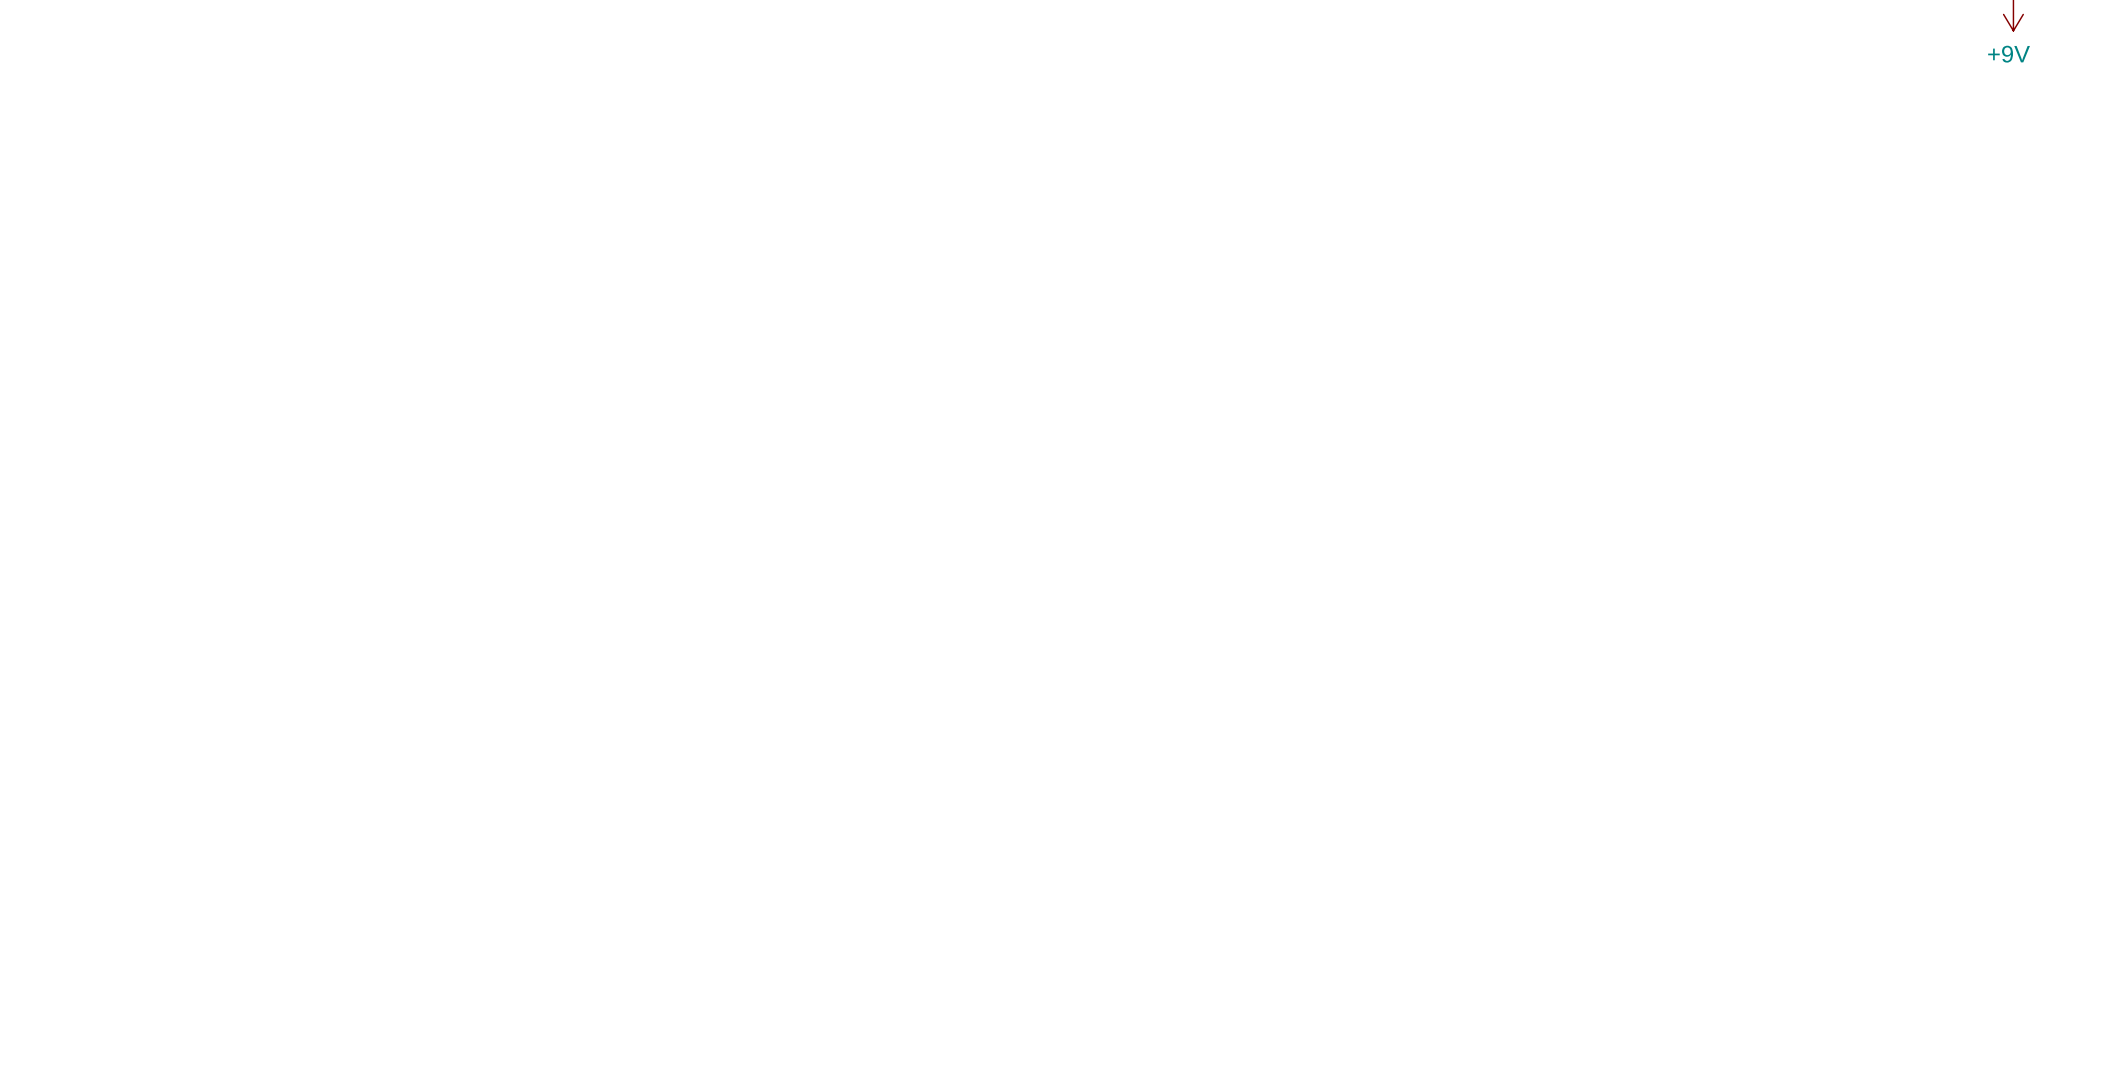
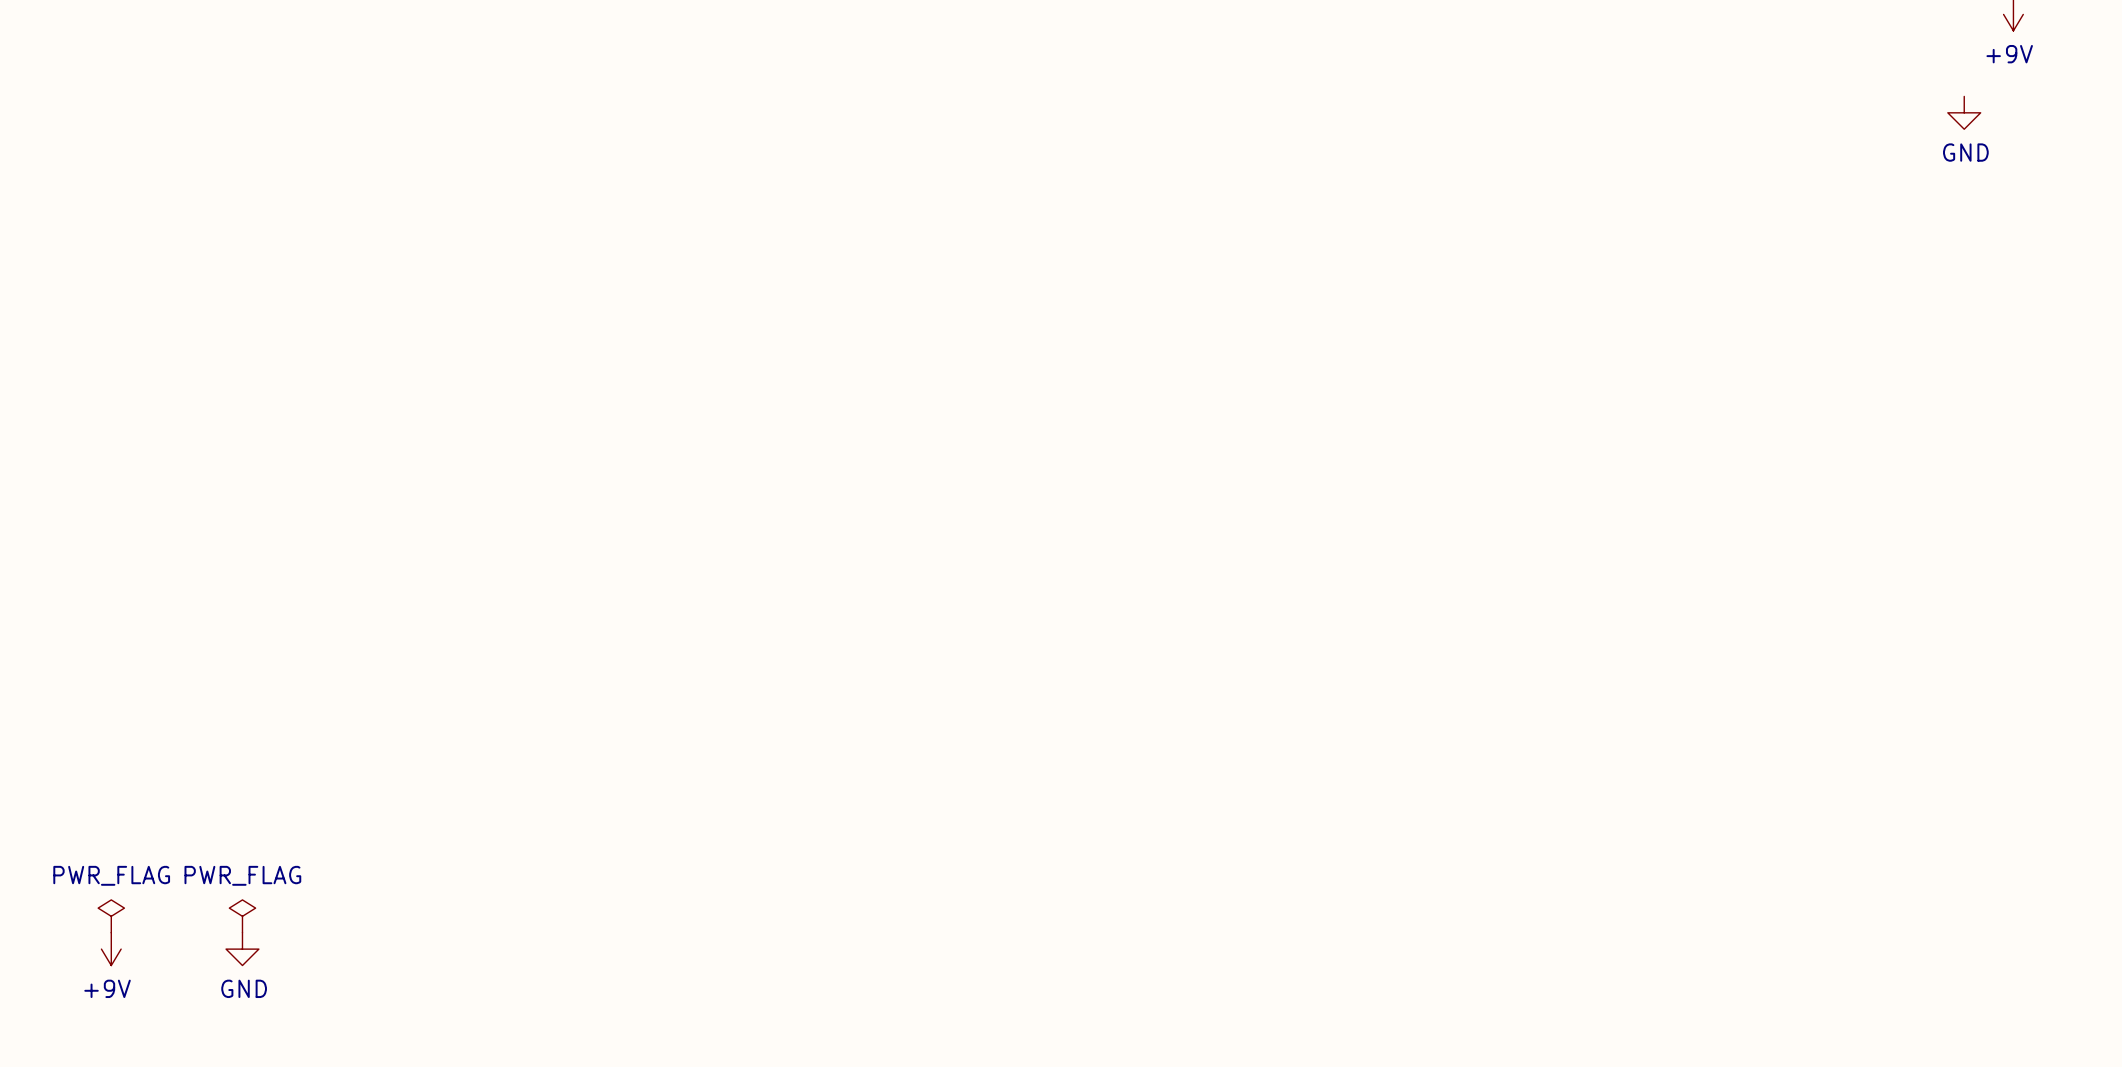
power symbol: none -> GND (1964, 112)
power symbol: none -> PWR_FLAG (111, 916)
power symbol: none -> PWR_FLAG (242, 916)
power symbol: none -> +9V (111, 949)
power symbol: none -> GND (242, 949)

